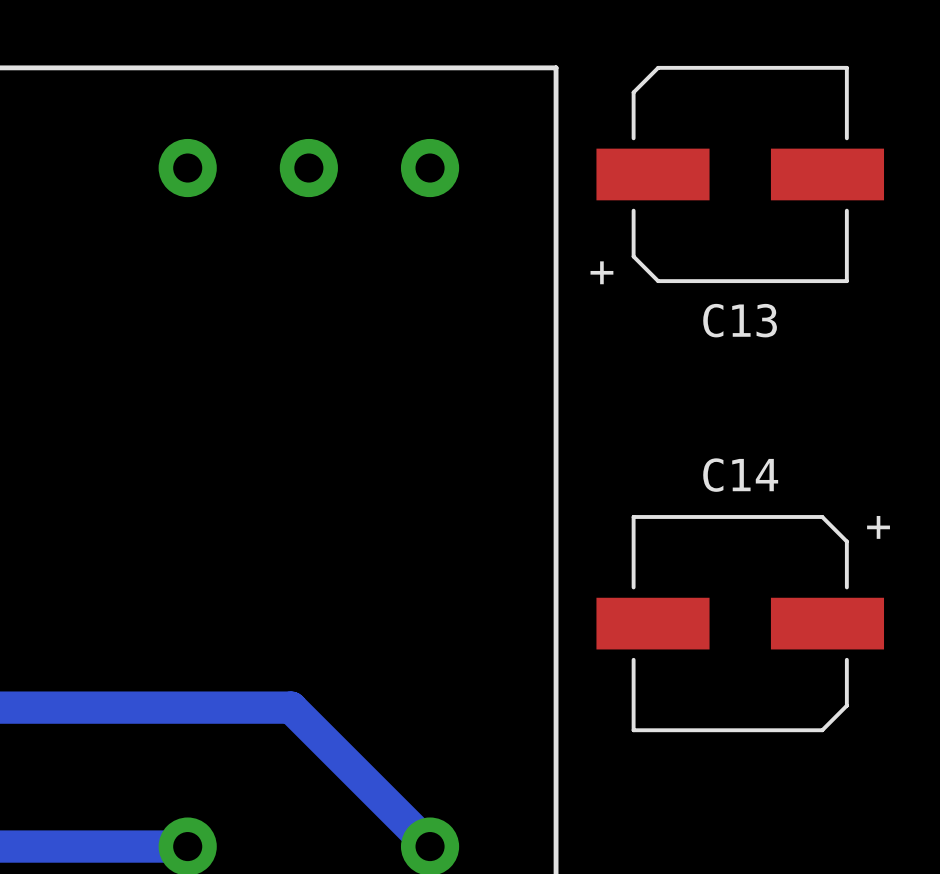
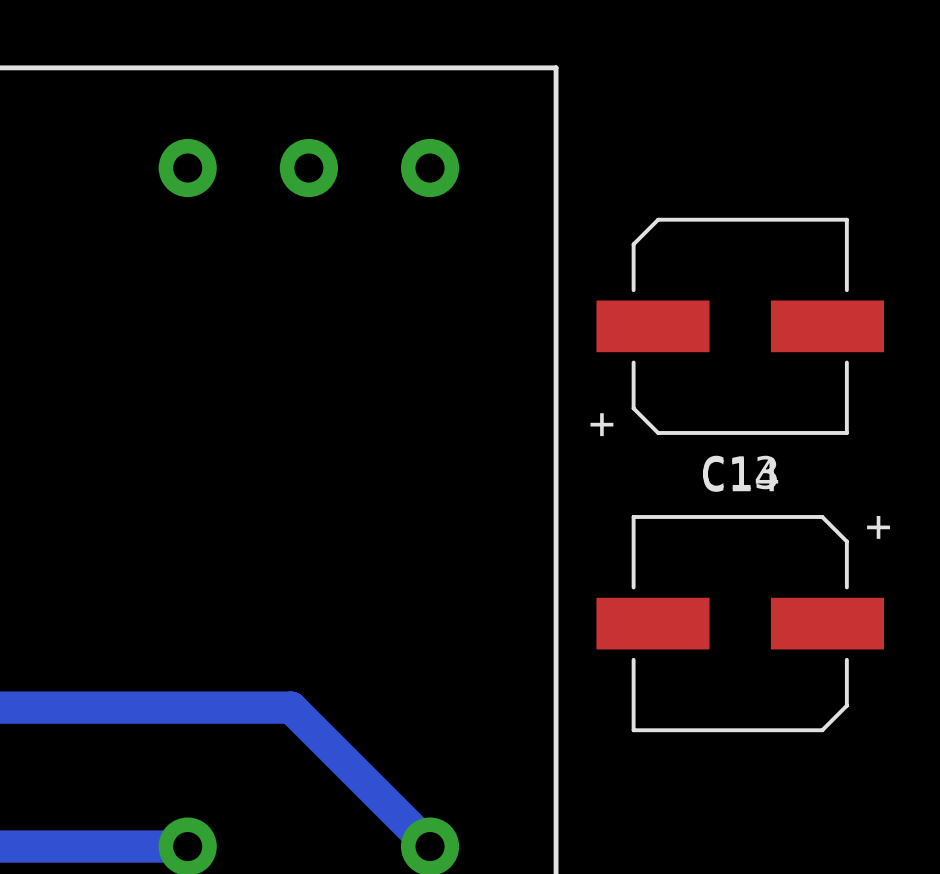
C13 position: (740, 174) -> (740, 326)

